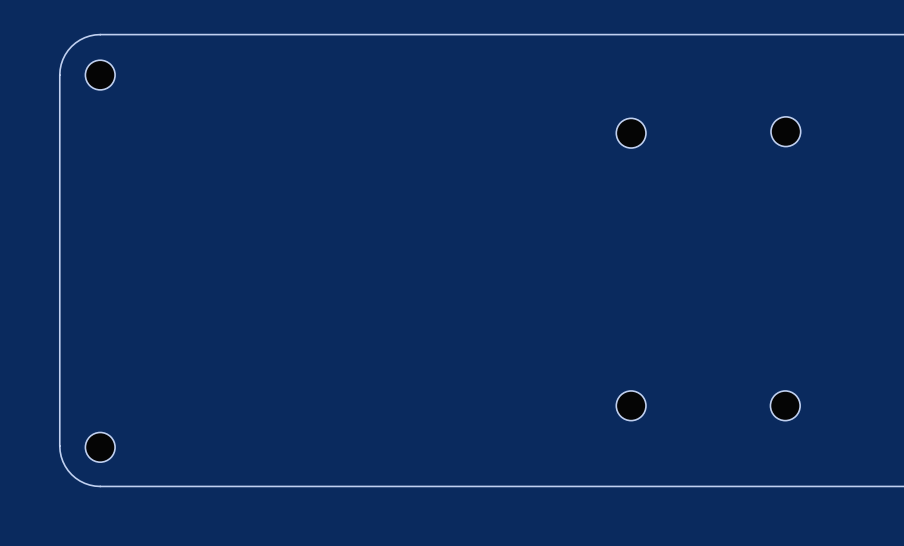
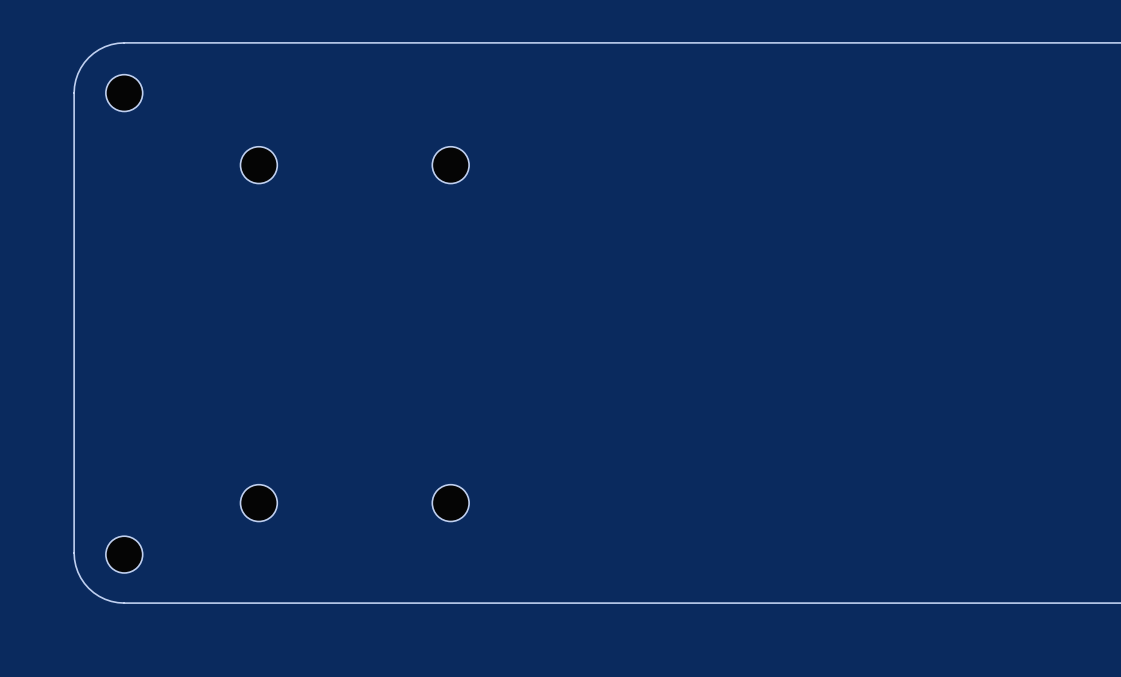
part: (785, 131) -> none
part: none -> (258, 165)
part: none -> (450, 165)
part: (631, 133) -> none
part: none -> (258, 503)
part: none -> (450, 503)
part: (631, 405) -> none
part: (785, 405) -> none

